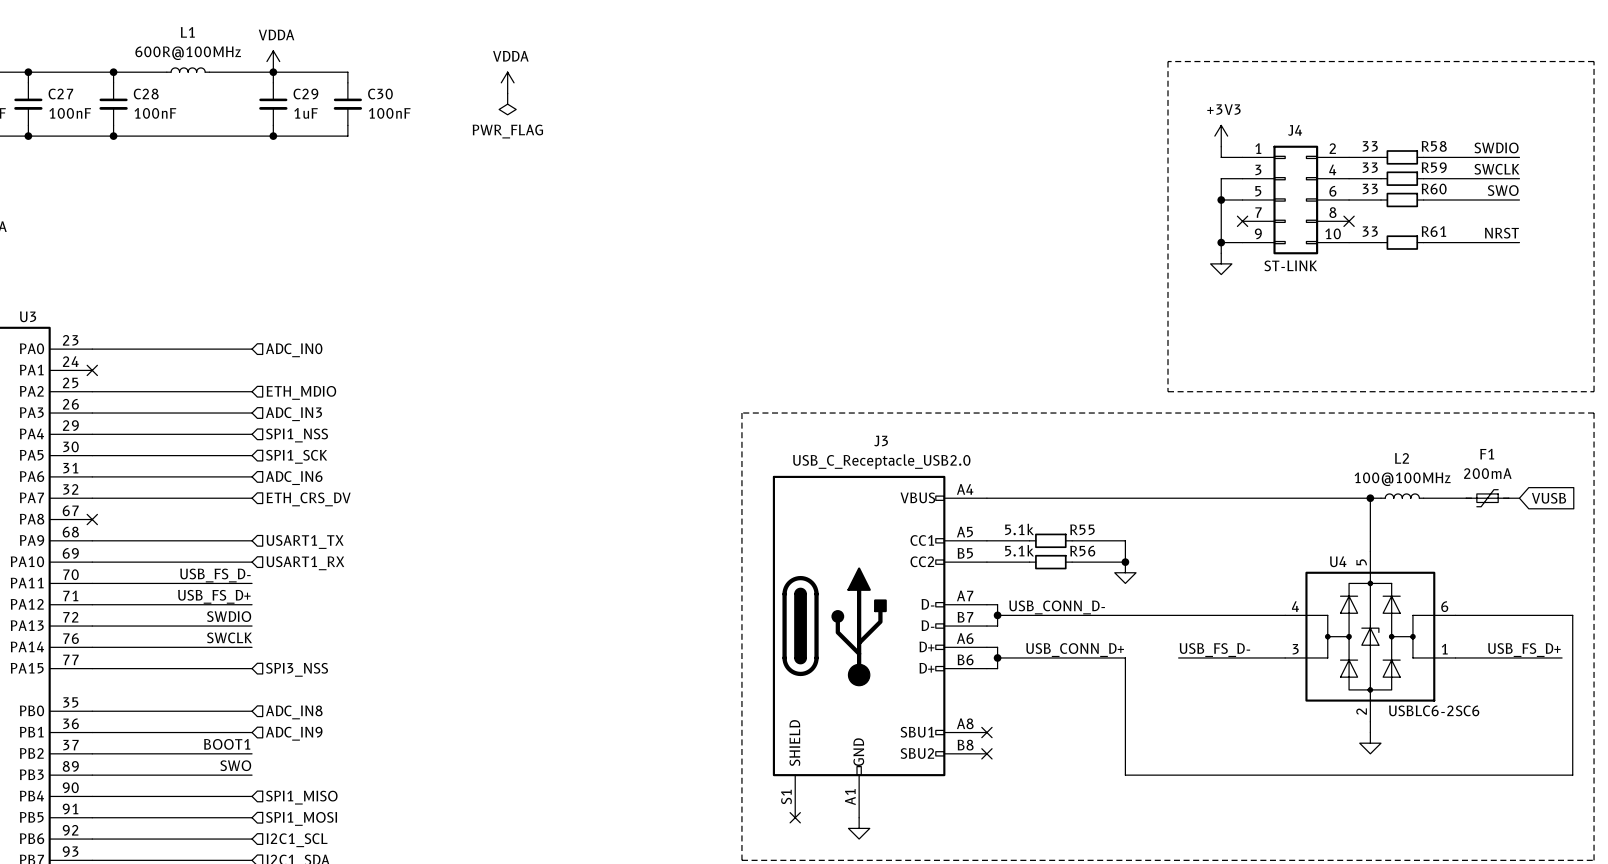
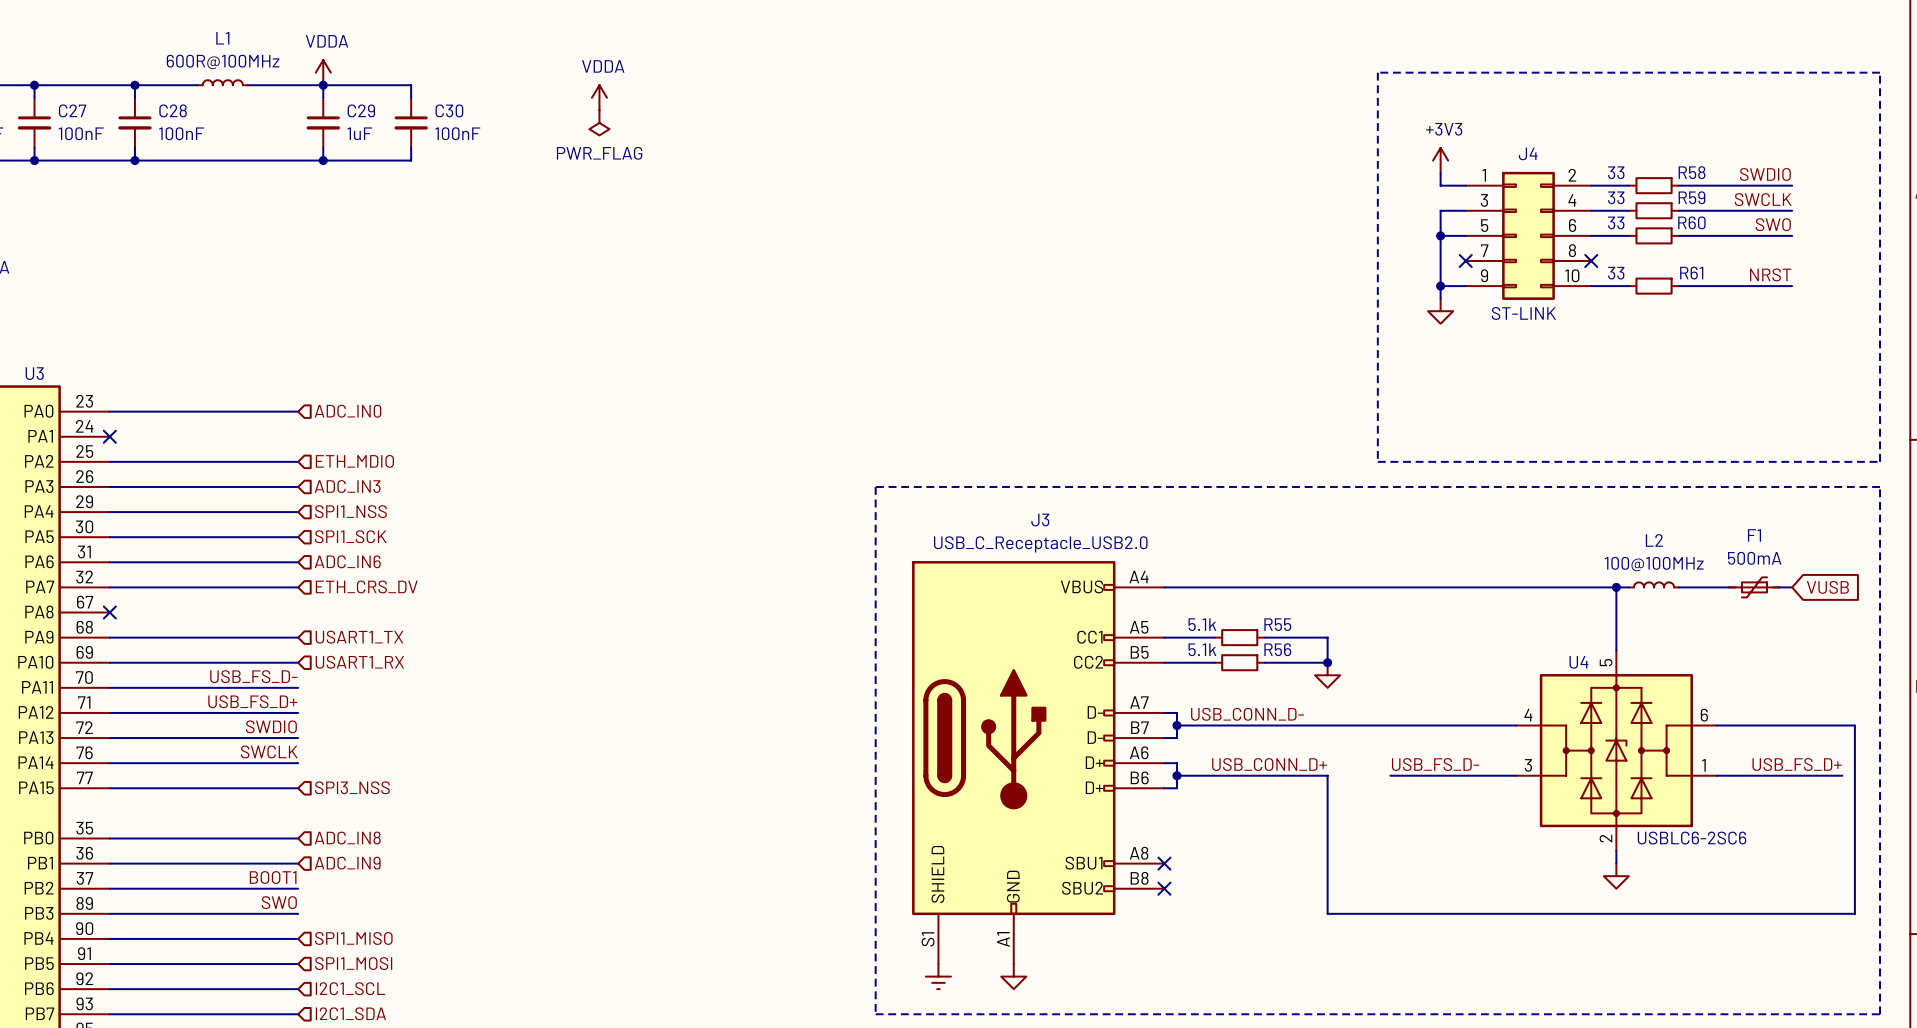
F1 value: 200mA (1487, 473) -> 500mA (1754, 558)
no-connect mark: (795, 817) -> none
power symbol: none -> (938, 976)

